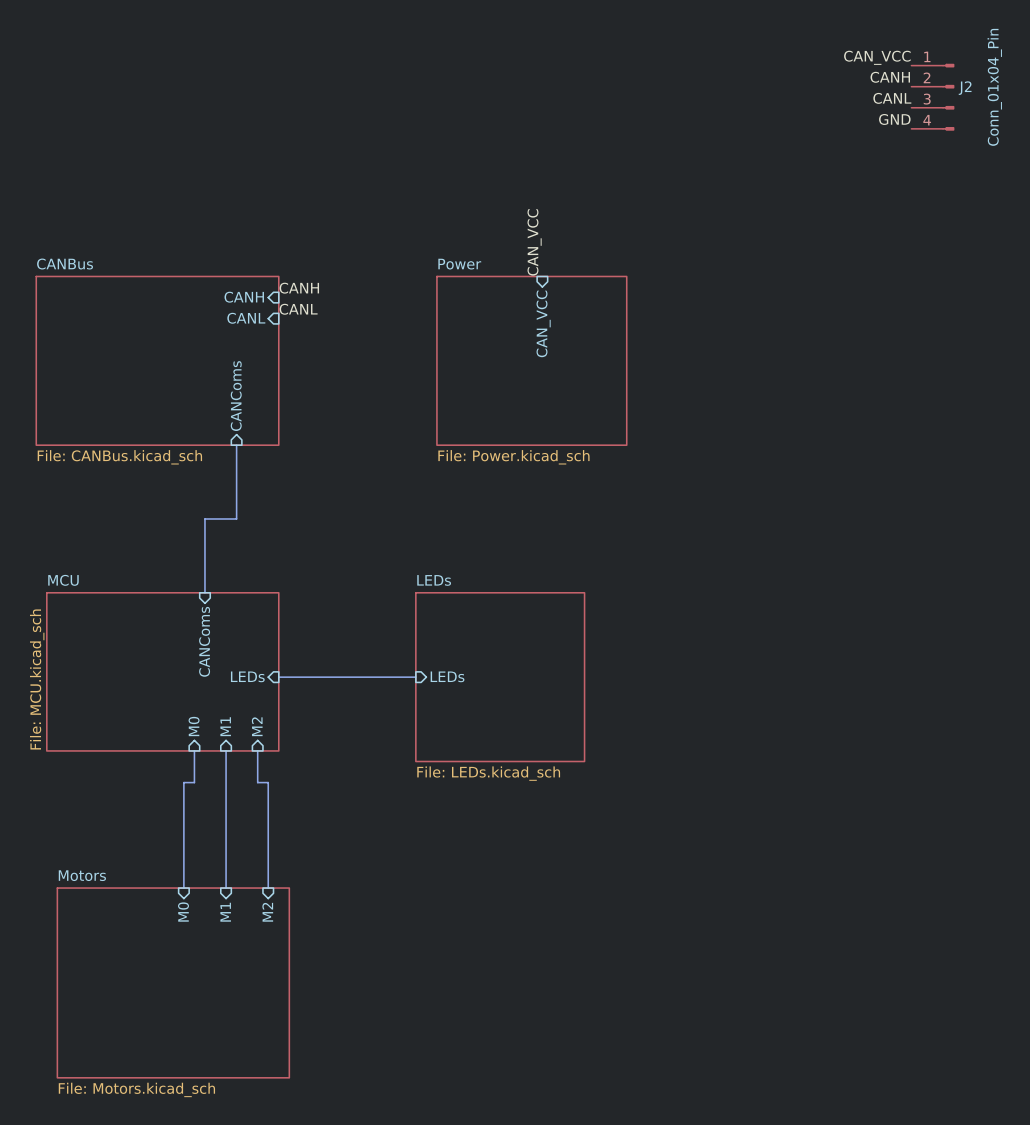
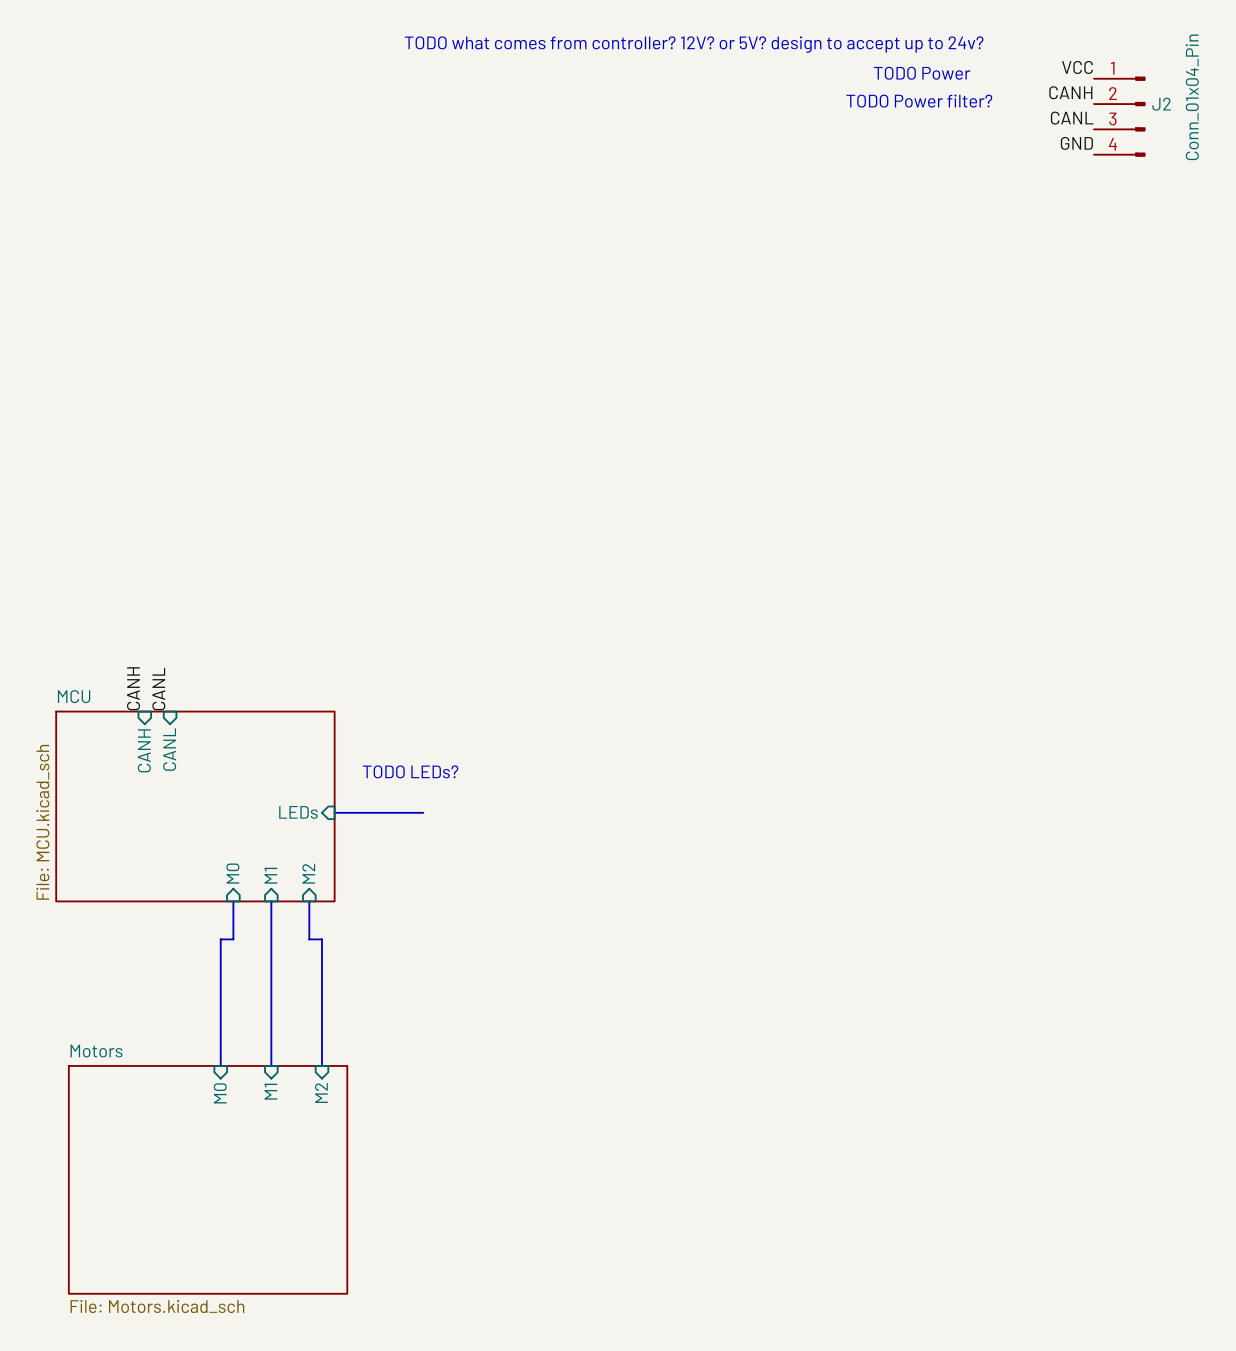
text: none -> TODO what comes from controller? 12V? or 5V? design to accept up to 24v? (694, 44)
label: CAN_VCC (877, 57) -> VCC (1077, 67)
text: none -> TODO Power (922, 73)
text: none -> TODO Power filter? (919, 101)
label: CAN_VCC (534, 242) -> none
label: CANH (299, 288) -> none
sheet pin: CANH (244, 297) -> none
label: CANL (298, 309) -> none
sheet pin: CANL (246, 318) -> none
sheet pin: CAN_VCC (543, 323) -> none
sheet CANBus: File: CANBus.kicad_sch (157, 360) -> none
sheet Power: File: Power.kicad_sch (531, 360) -> none
sheet pin: CANComs (236, 396) -> none
bus: (236, 445) (236, 518) (204, 518) (204, 592) -> none
label: none -> CANH (133, 688)
label: none -> CANL (158, 689)
sheet pin: none -> CANL (169, 749)
sheet pin: none -> CANH (144, 750)
sheet pin: CANComs (204, 641) -> none
text: none -> TODO LEDs? (410, 771)
sheet pin: LEDs (447, 676) -> none
bus: (352, 677) (415, 677) -> none
sheet LEDs: File: LEDs.kicad_sch (500, 677) -> none

